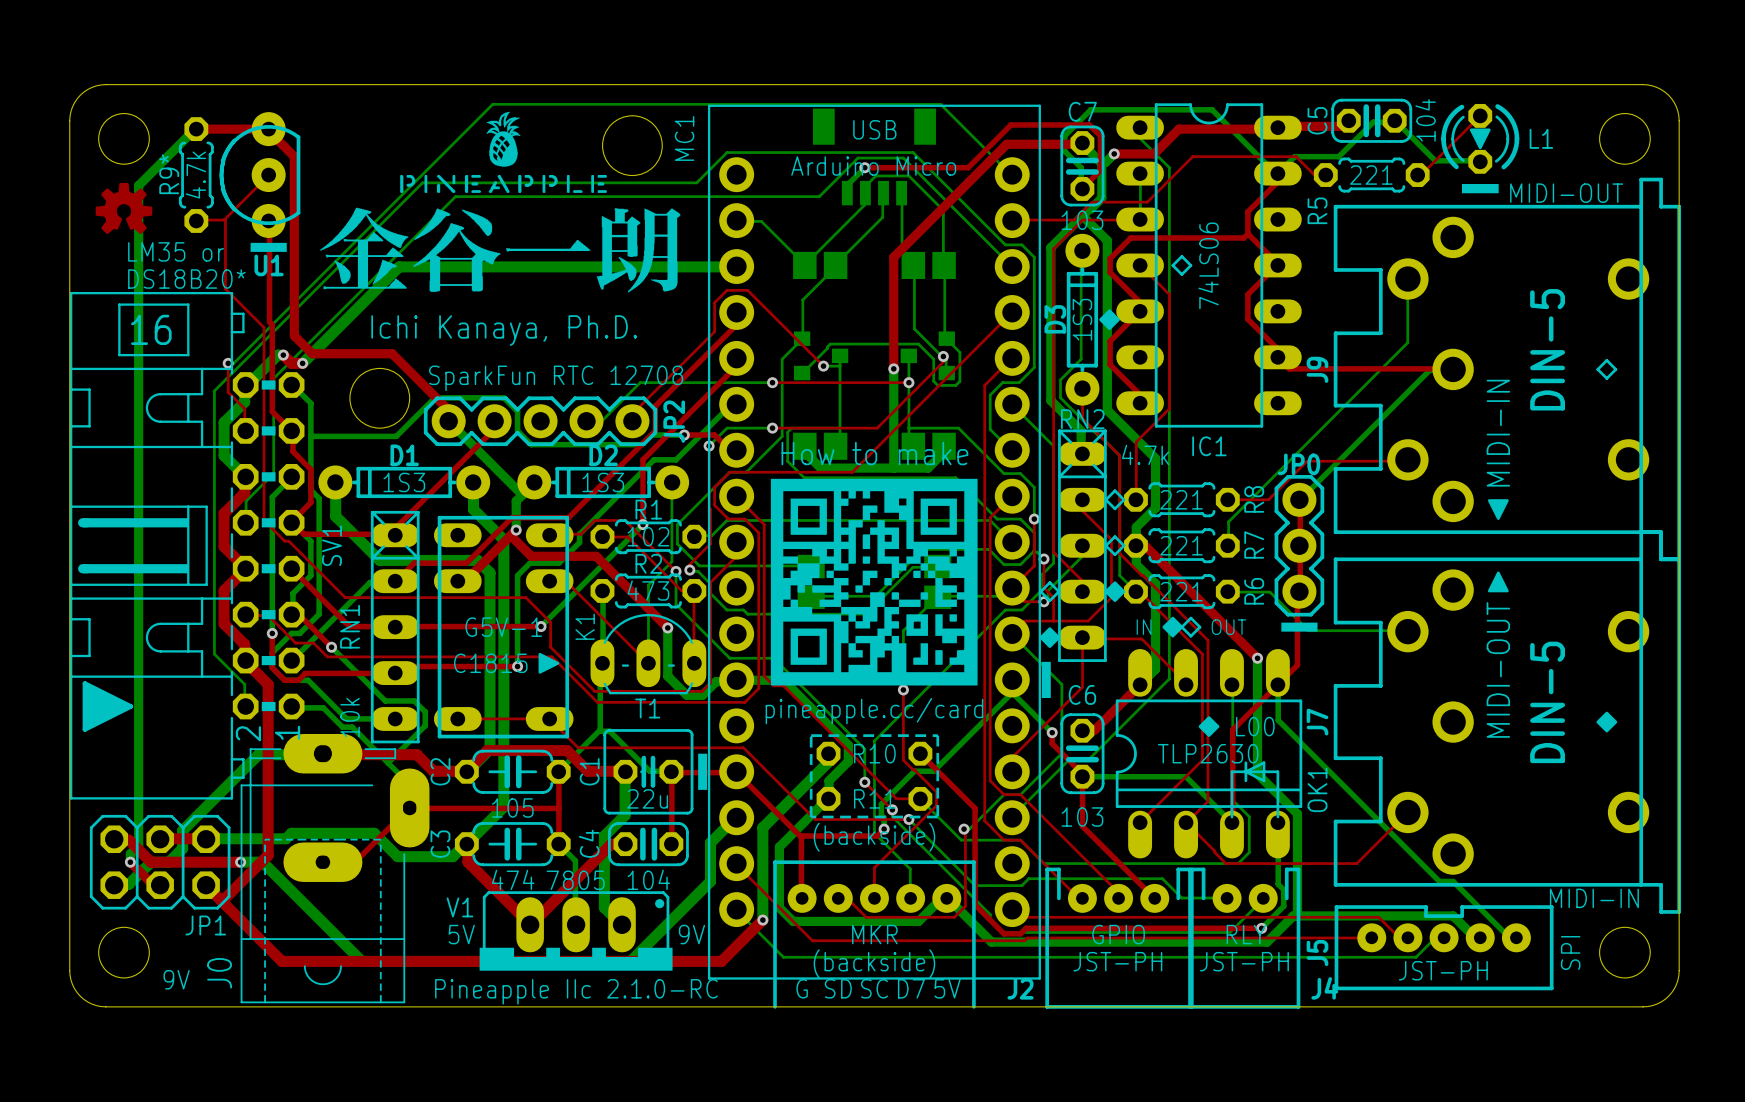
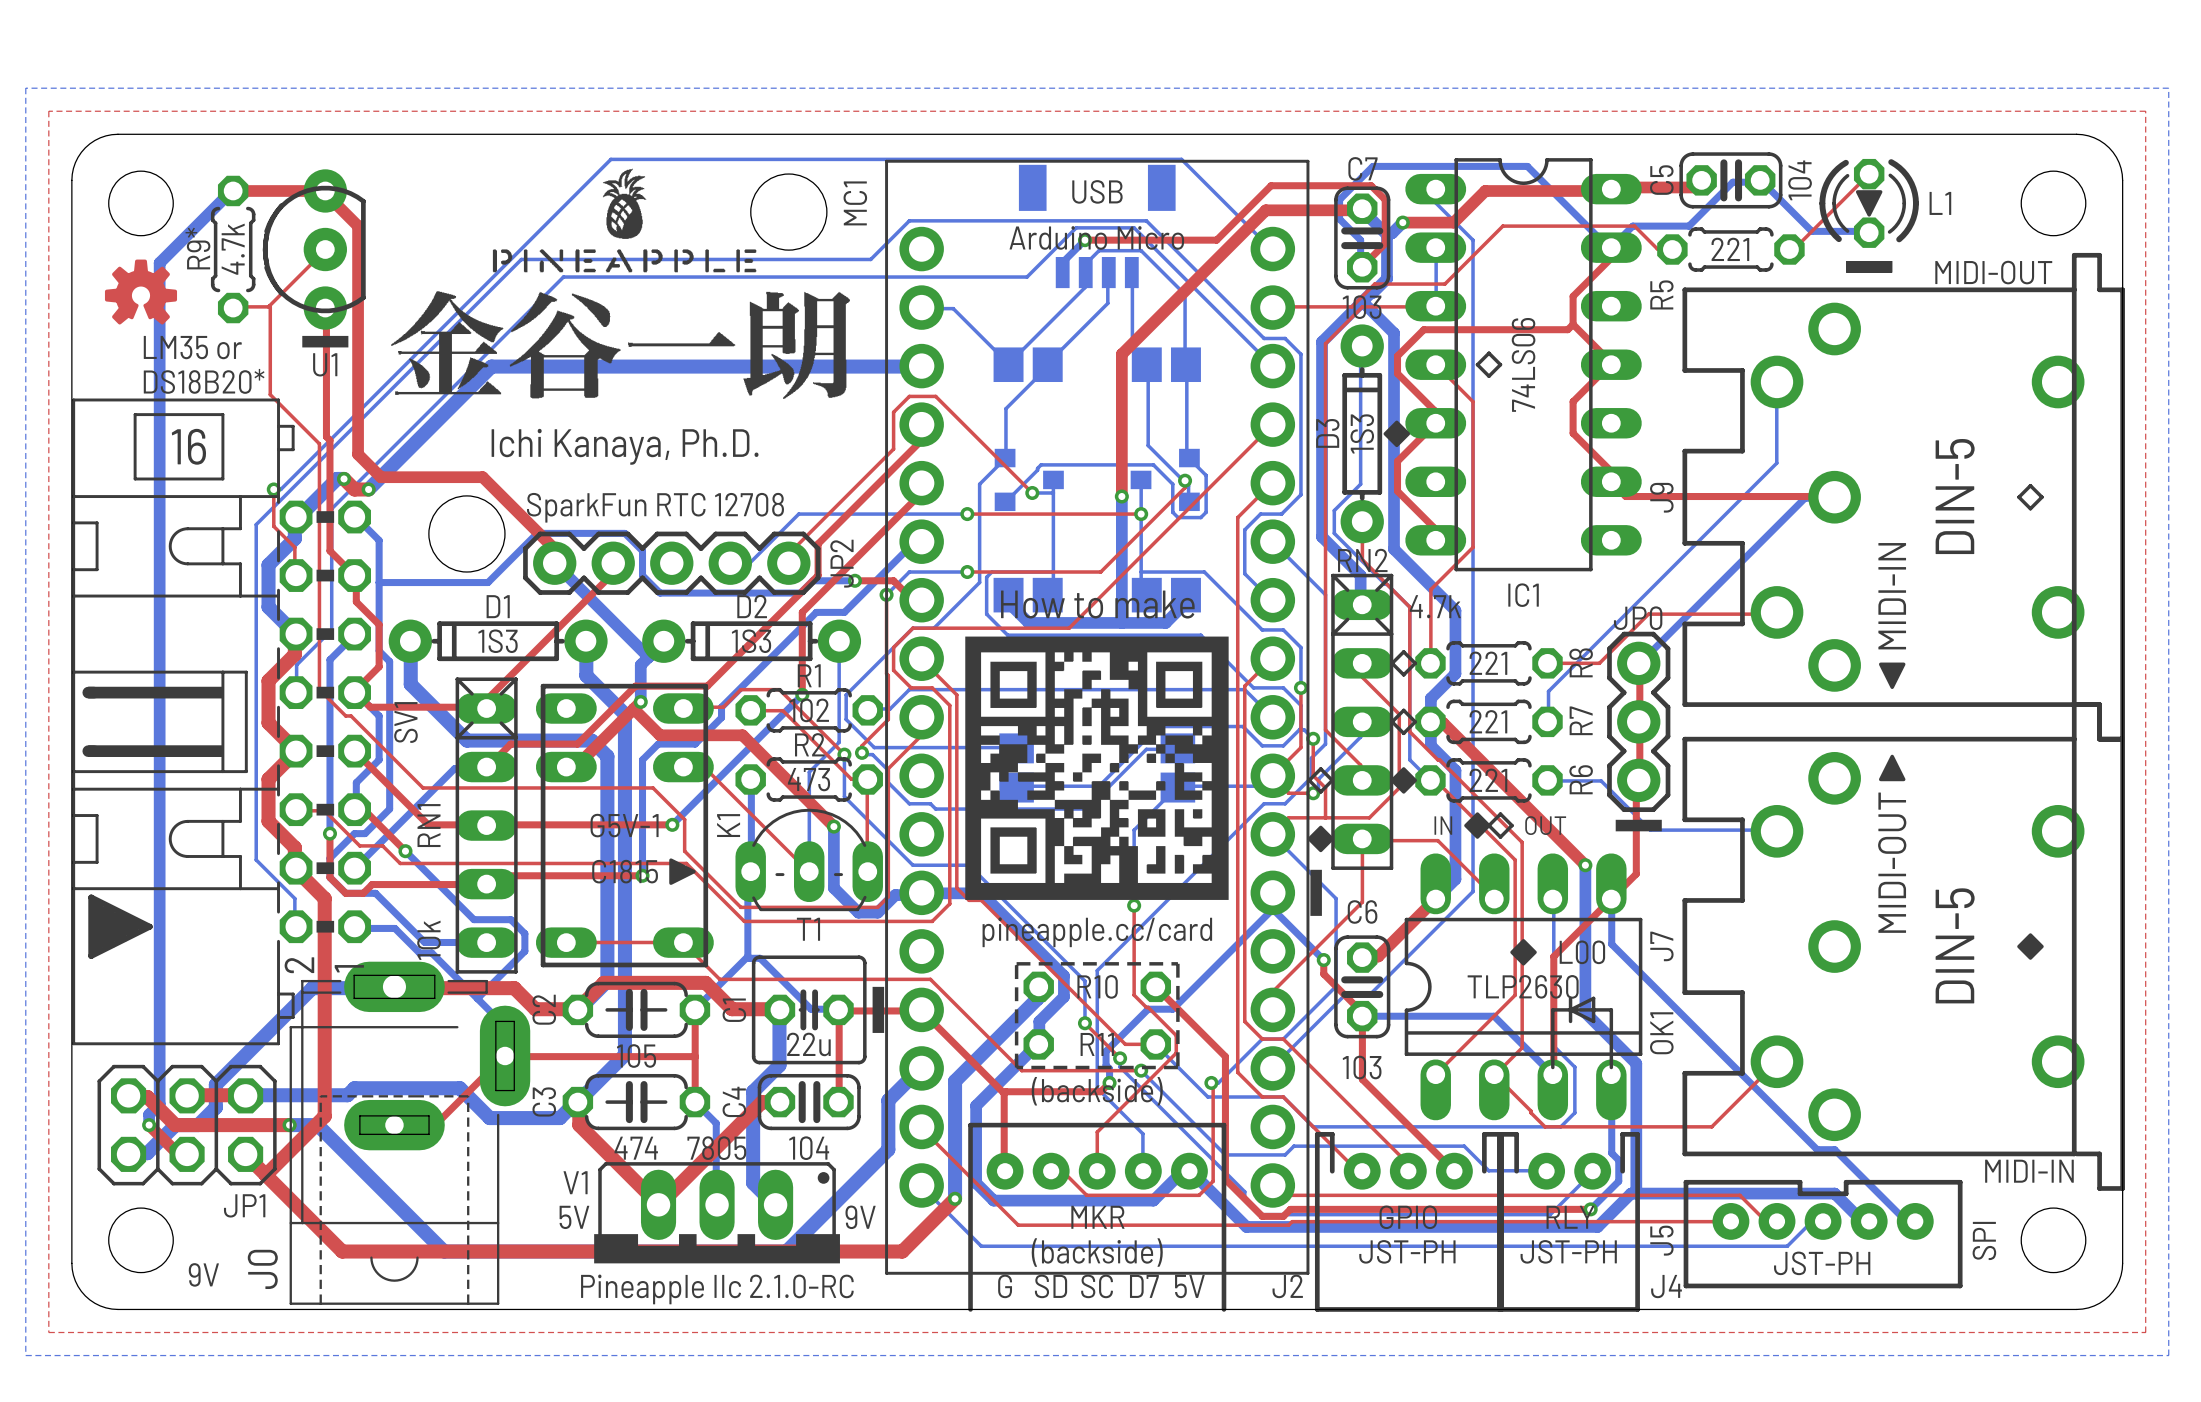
bottom zone outline: none -> (25, 88) (2168, 88) (2168, 1355) (25, 1355) (25, 88)
top zone outline: none -> (48, 111) (2145, 111) (2145, 1332) (48, 1332) (48, 111)

